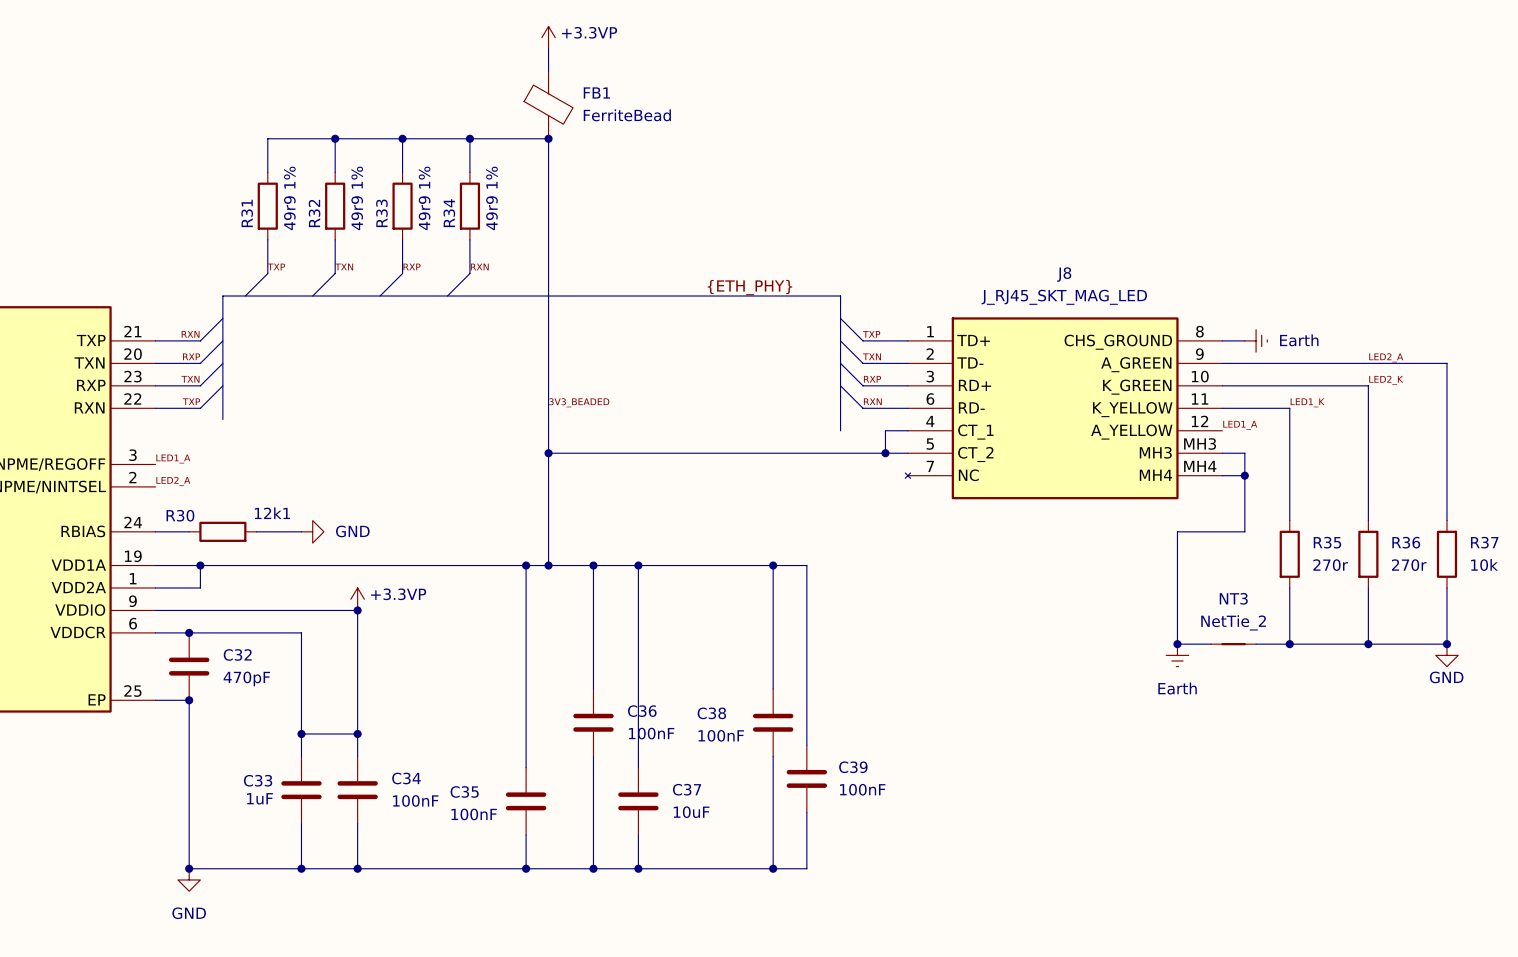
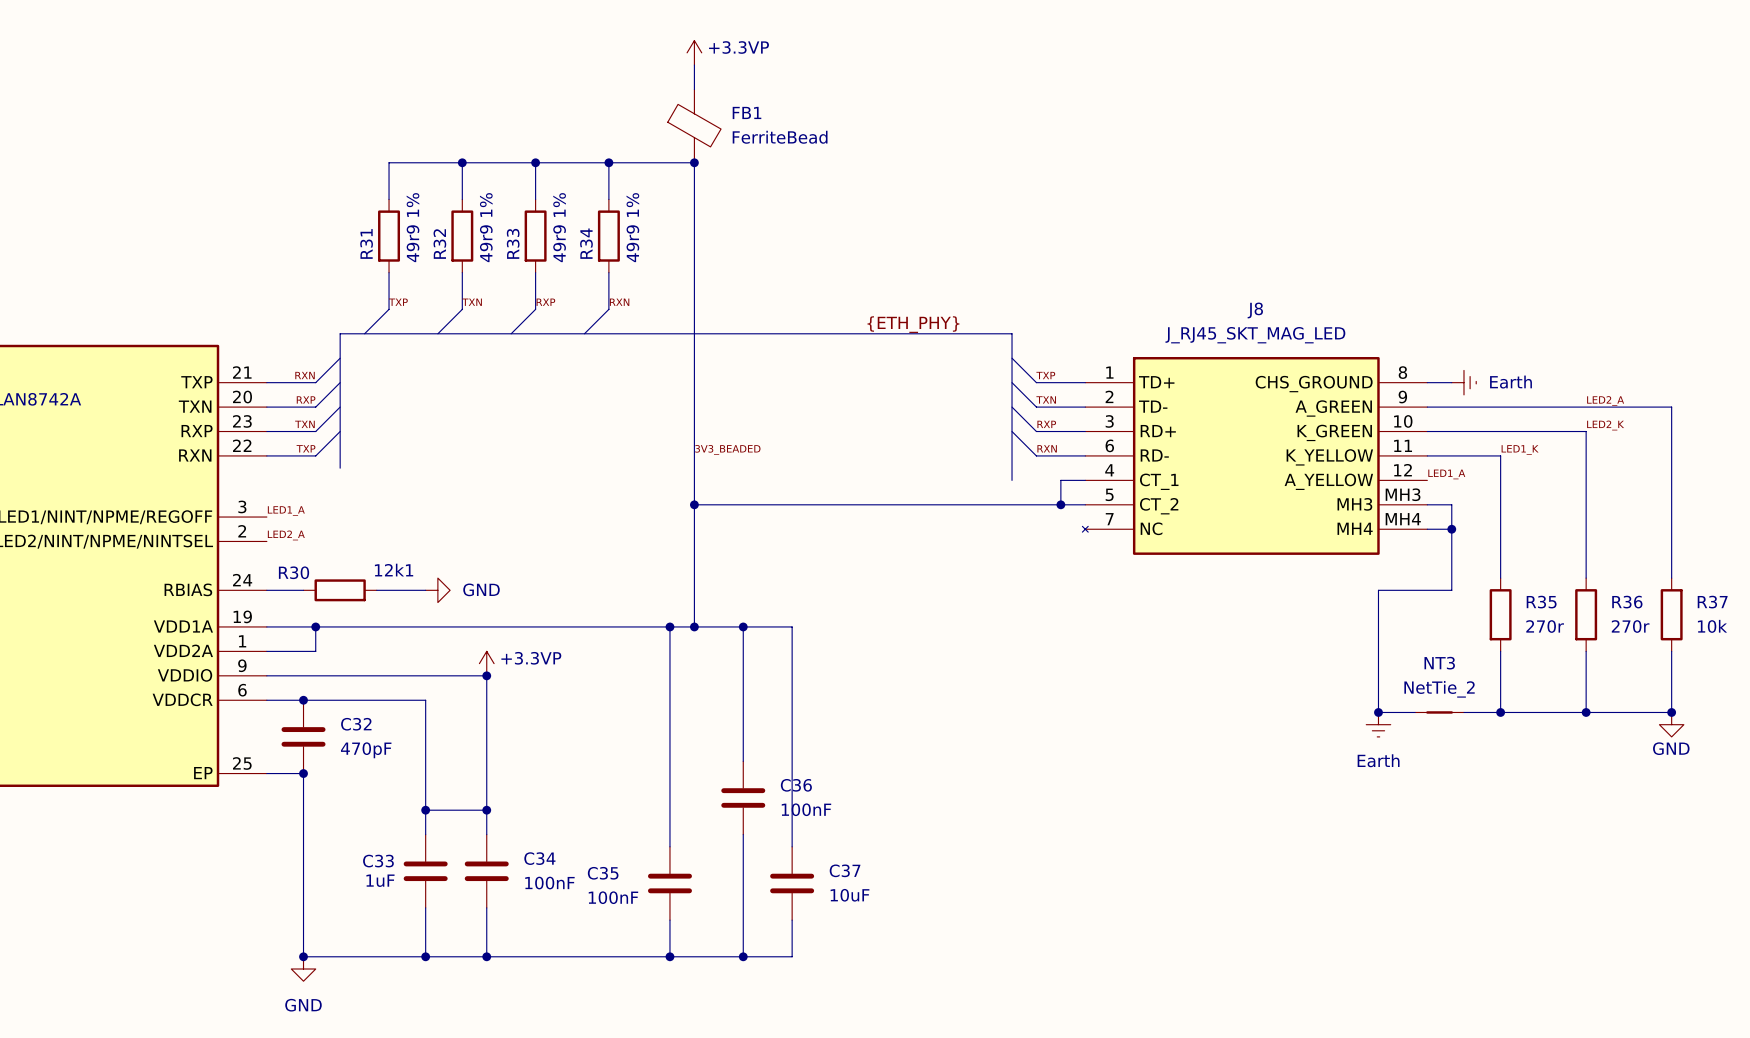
wire: (638, 565) (806, 565) (806, 745) -> none
junction: (638, 565) -> none
wire: (773, 565) (773, 689) -> none
junction: (773, 565) -> none
C38: 100nF (773, 722) -> none
wire: (773, 756) (773, 868) -> none
C39: 100nF (806, 778) -> none
wire: (806, 812) (806, 868) (638, 868) -> none
junction: (638, 868) -> none
junction: (773, 868) -> none

